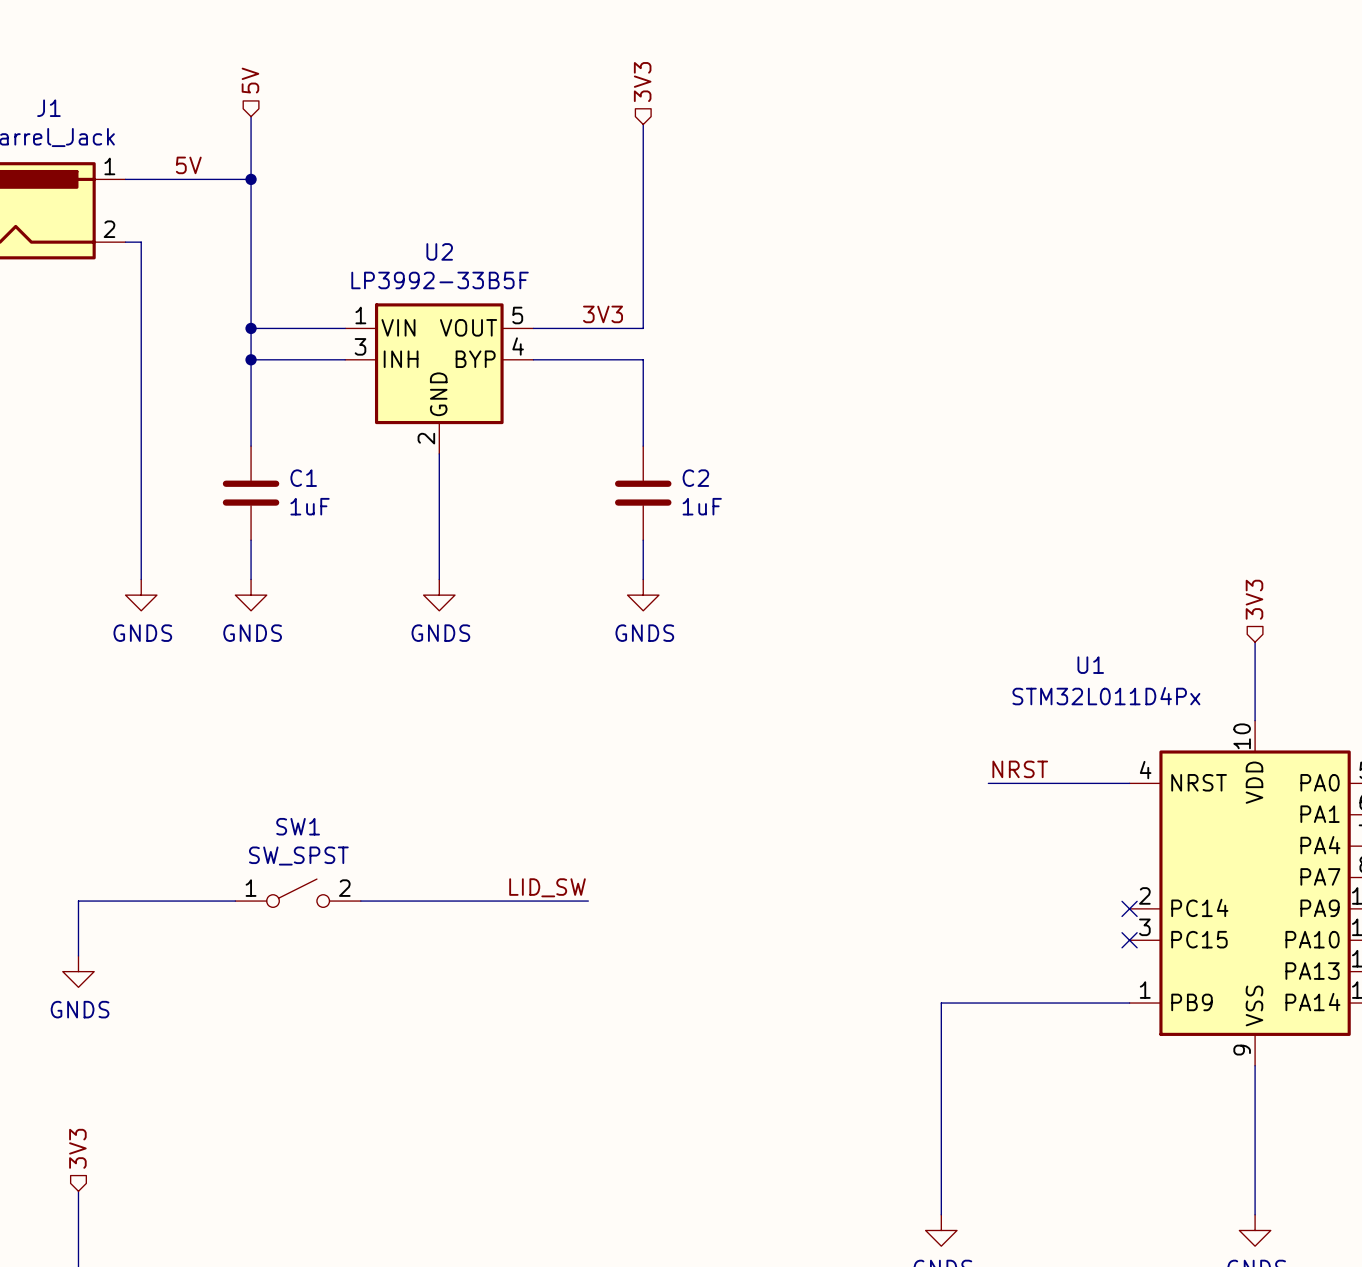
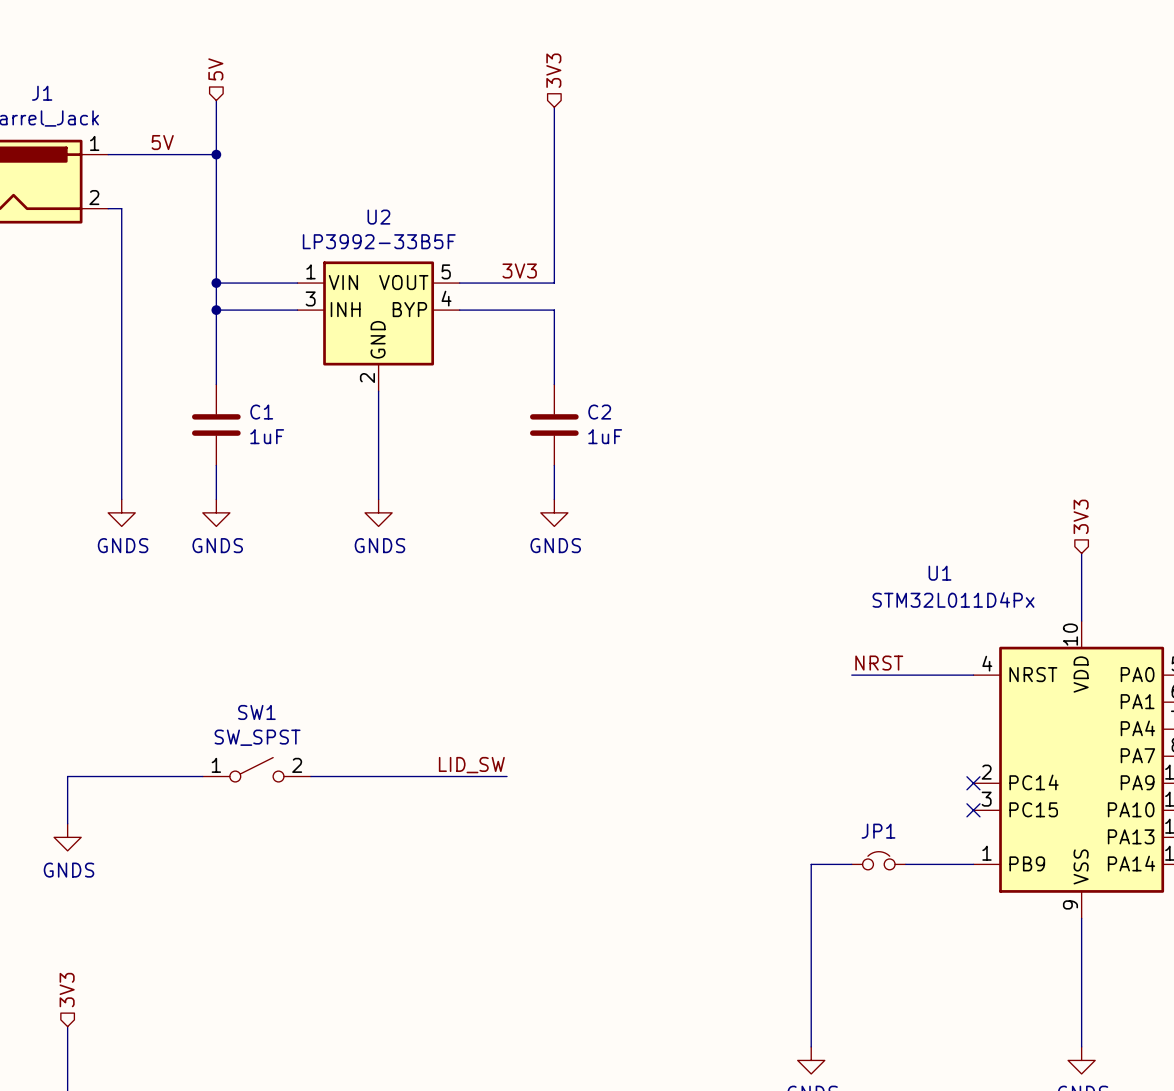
JP1: none -> (878, 860)
wire: (988, 1003) (1051, 1003) -> none

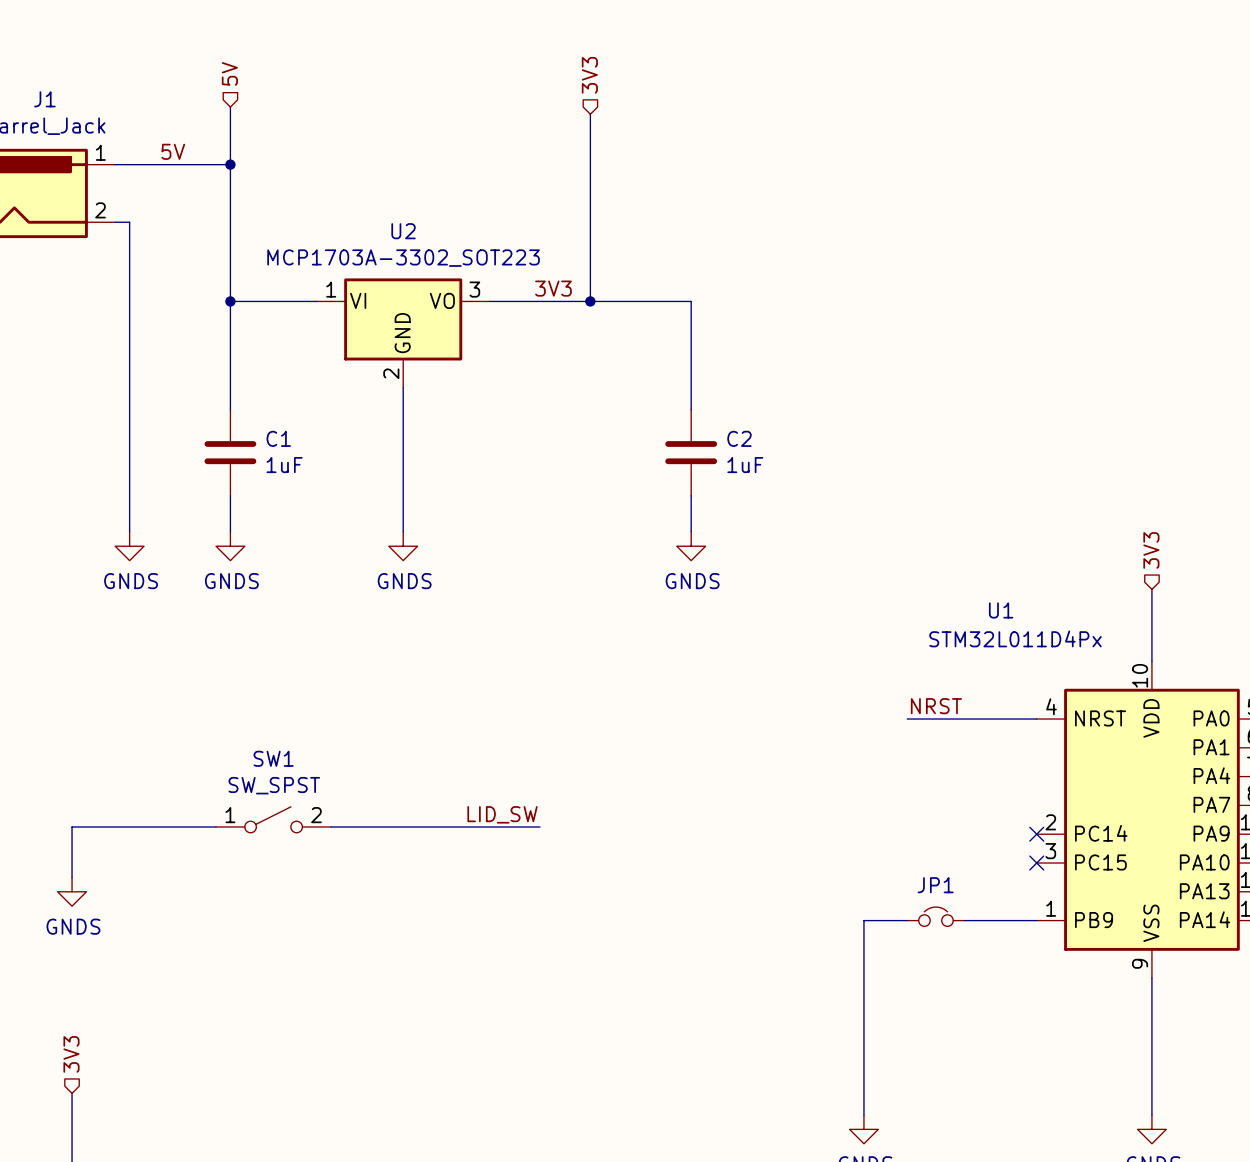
U2 value: LP3992-33B5F (379, 241) -> MCP1703A-3302_SOT223 (403, 258)
U2 symbol: [297, 261, 460, 392] -> [316, 278, 490, 388]
wire: none -> (590, 301) (691, 301) (691, 409)
junction: none -> (590, 301)
wire: (216, 310) (297, 310) -> none
junction: (216, 310) -> none
wire: (459, 310) (554, 310) (554, 384) -> none
C2 position: (554, 425) -> (691, 452)
wire: (554, 465) (554, 499) -> (691, 495) (691, 531)
power symbol position: GNDS (554, 512) -> GNDS (691, 546)

